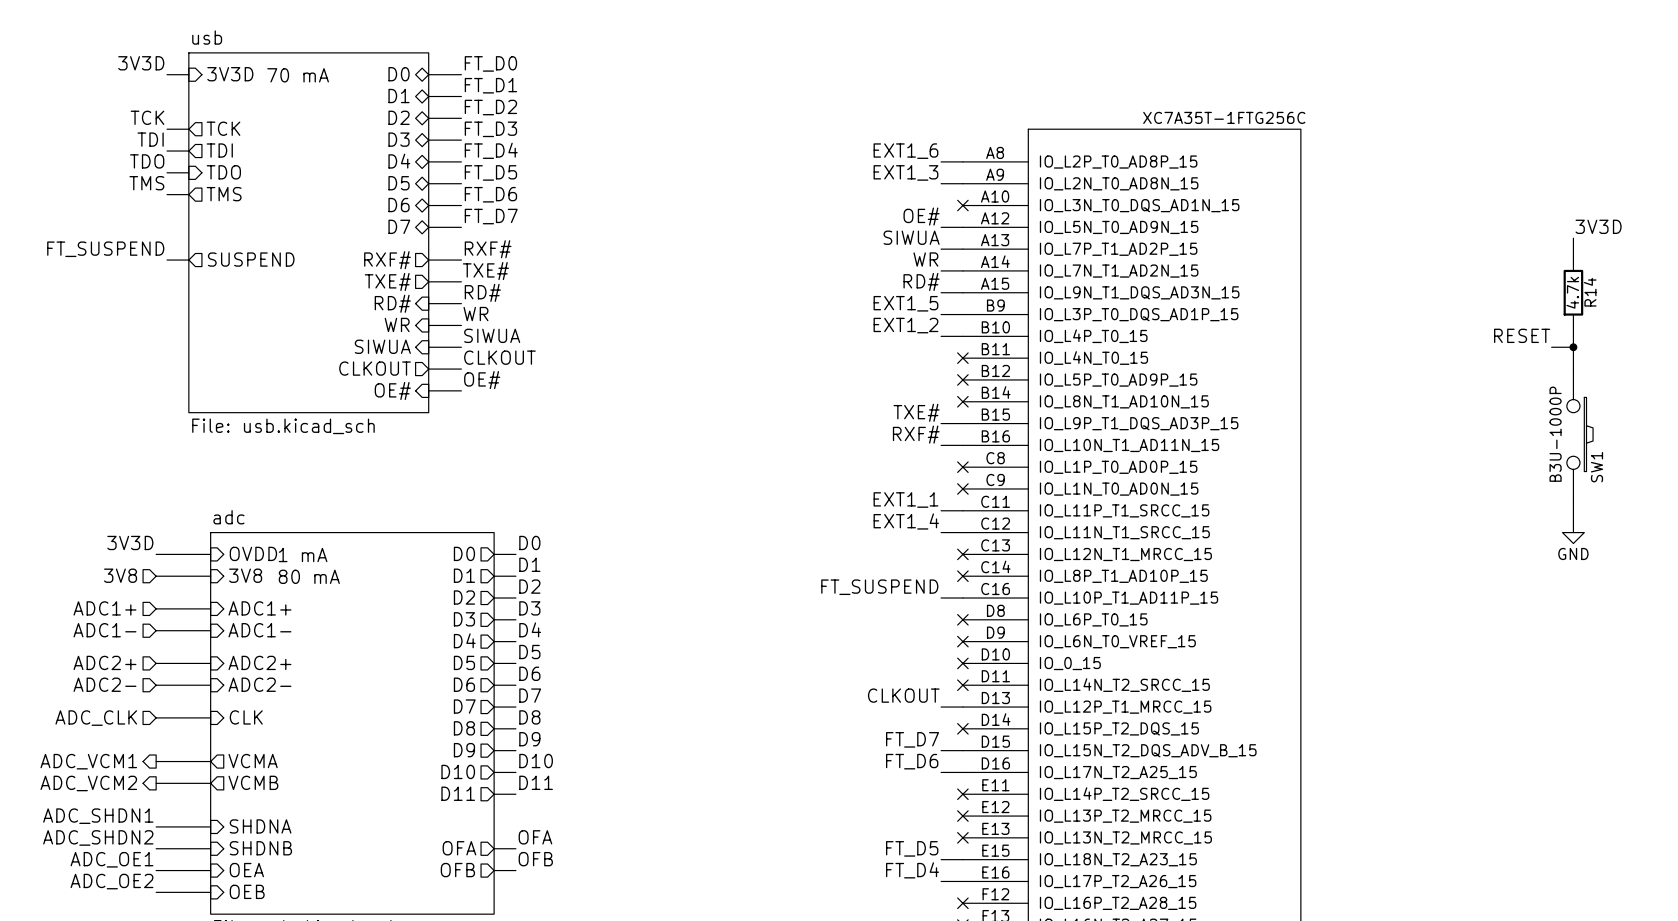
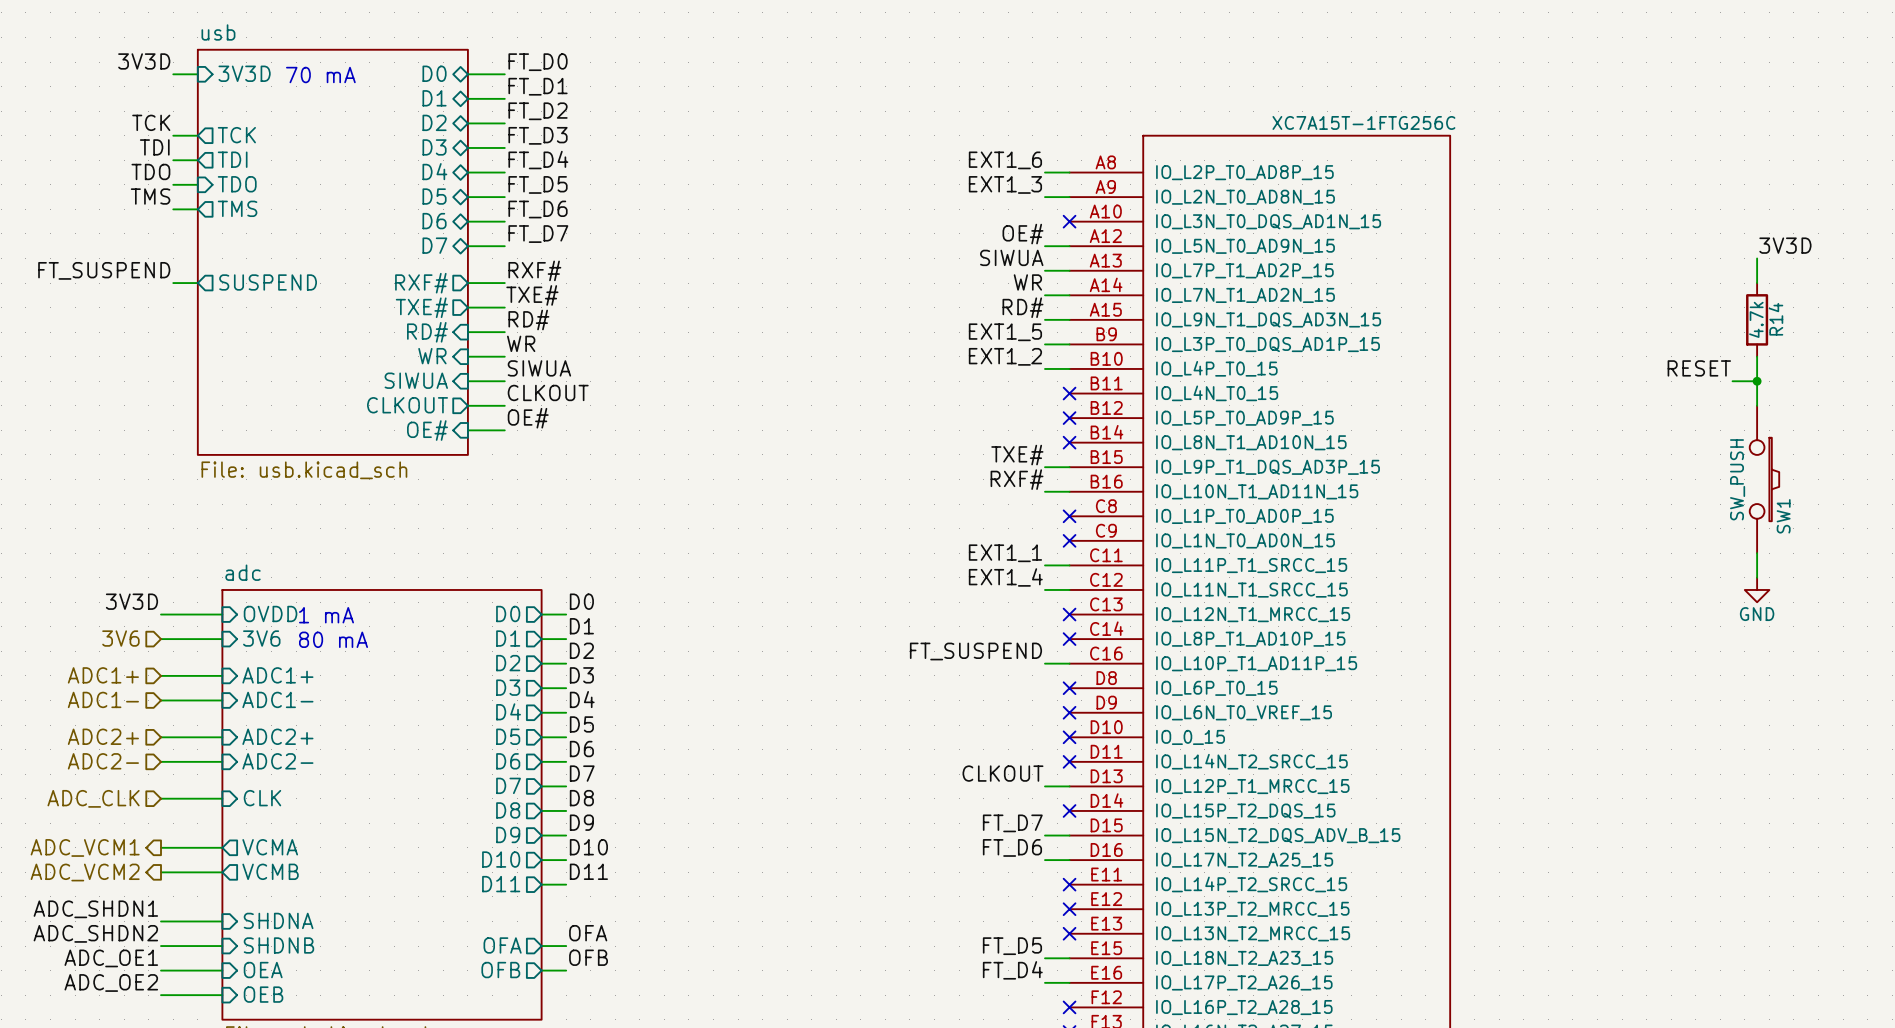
part value: XC7A35T-1FTG256C (1224, 117) -> XC7A15T-1FTG256C (1363, 122)
SW1 value: B3U-1000P (1555, 434) -> SW_PUSH (1737, 479)
hierarchical label: 3V8 (120, 575) -> 3V6 (120, 638)
sheet pin: 3V8 (245, 575) -> 3V6 (261, 638)

